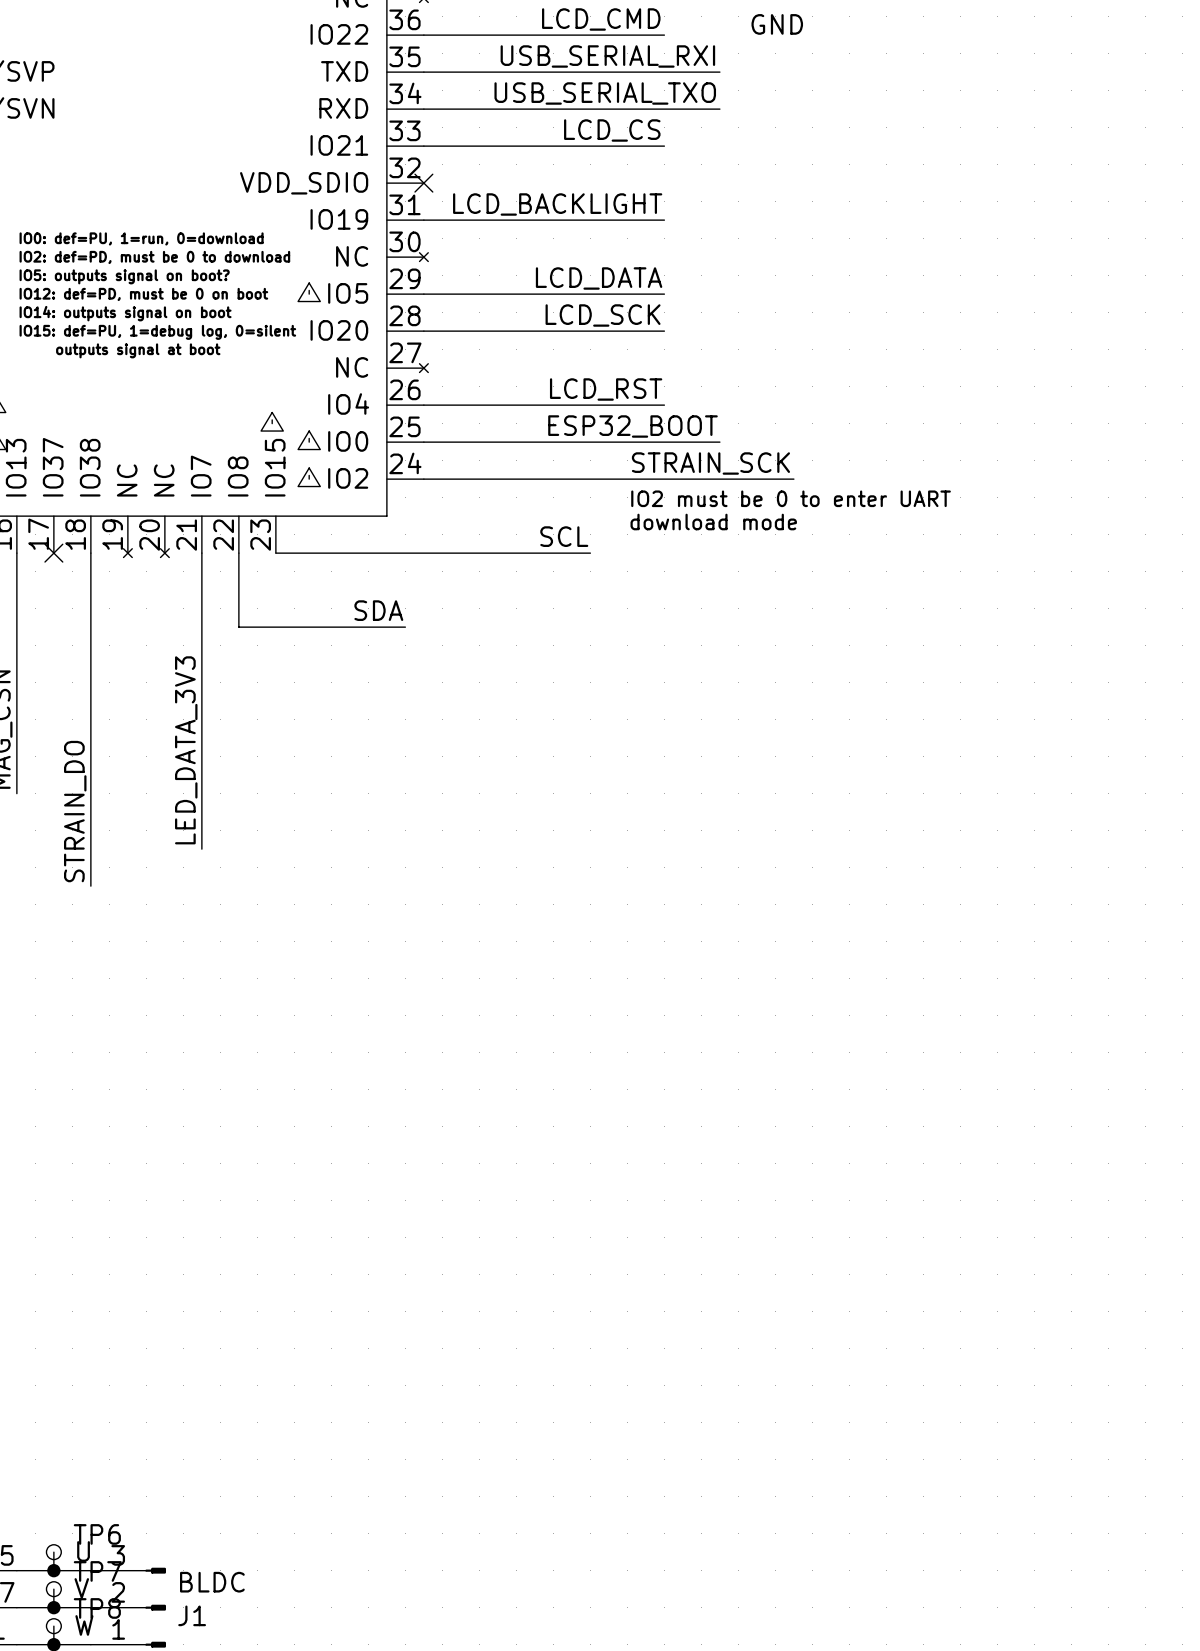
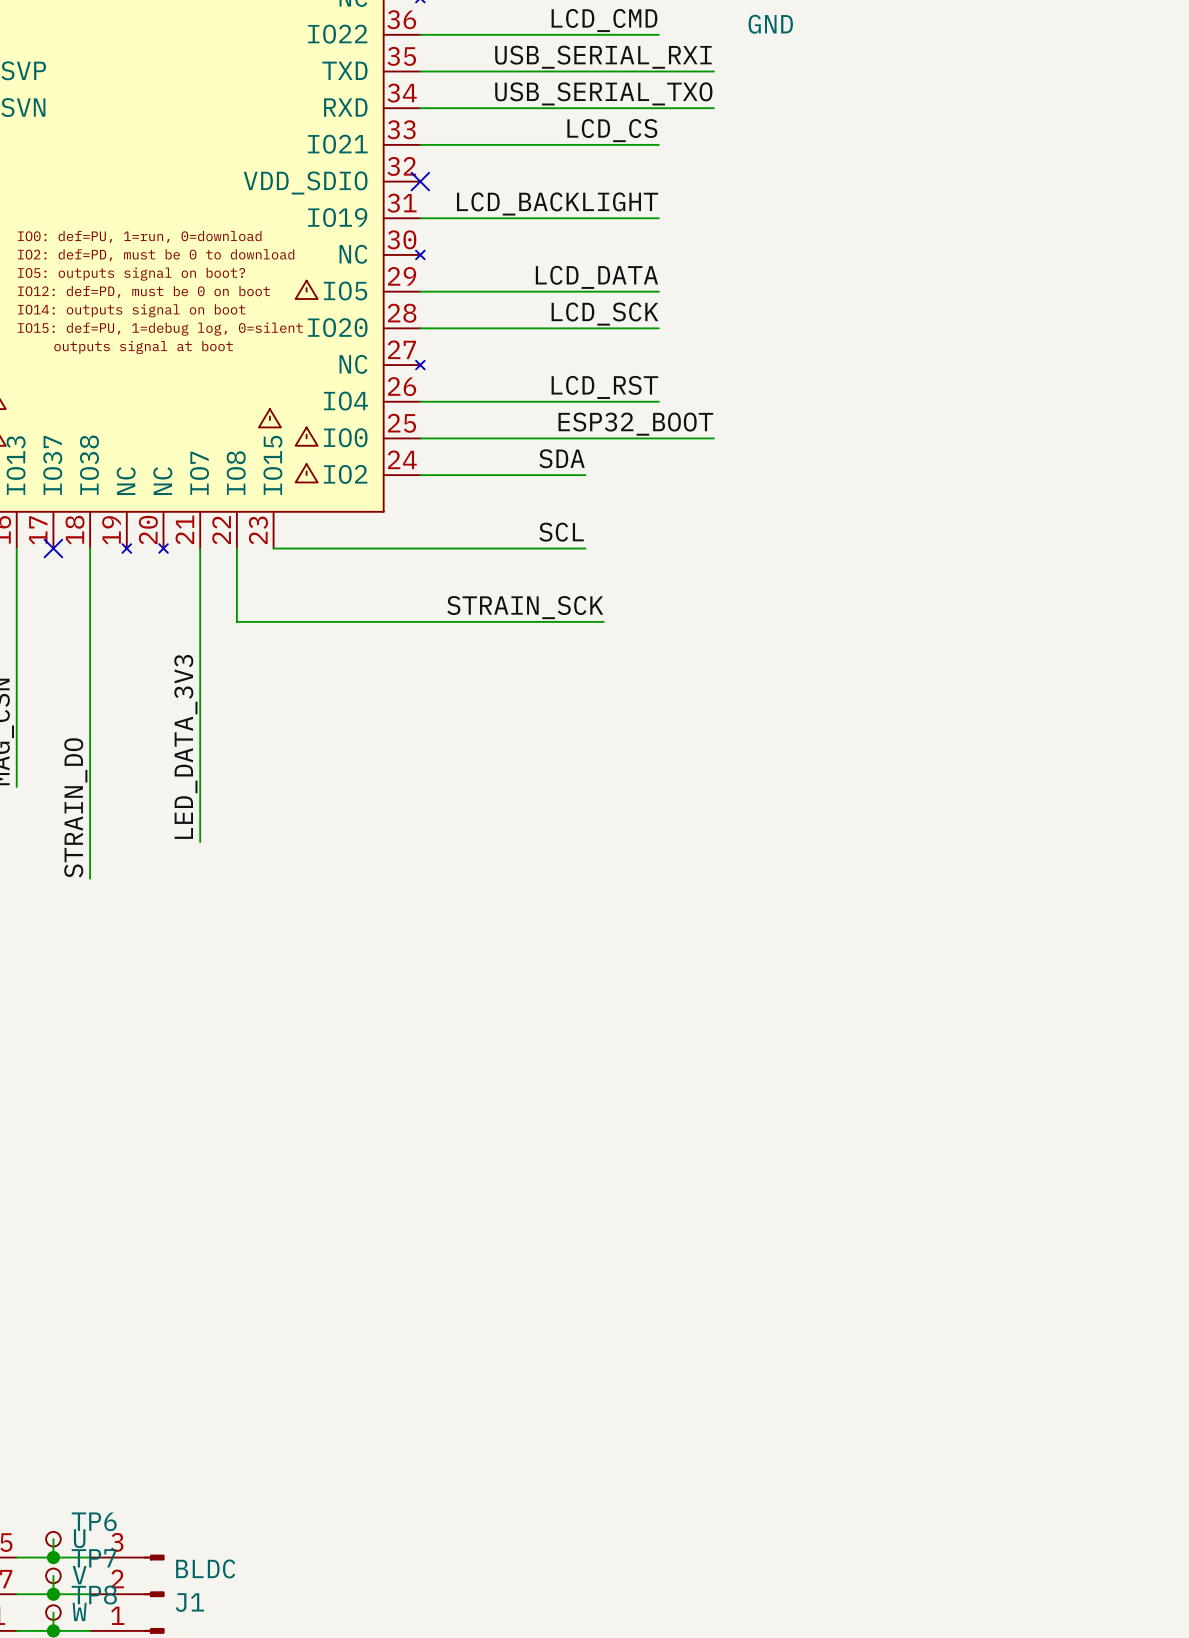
label position: STRAIN_SCK (710, 463) -> STRAIN_SCK (525, 607)
wire: (590, 479) (793, 479) -> (402, 621) (603, 621)
text: IO2 must be 0 to enter UART (791, 498) -> none
text: download mode (713, 522) -> none
label position: SDA (378, 610) -> SDA (562, 458)

